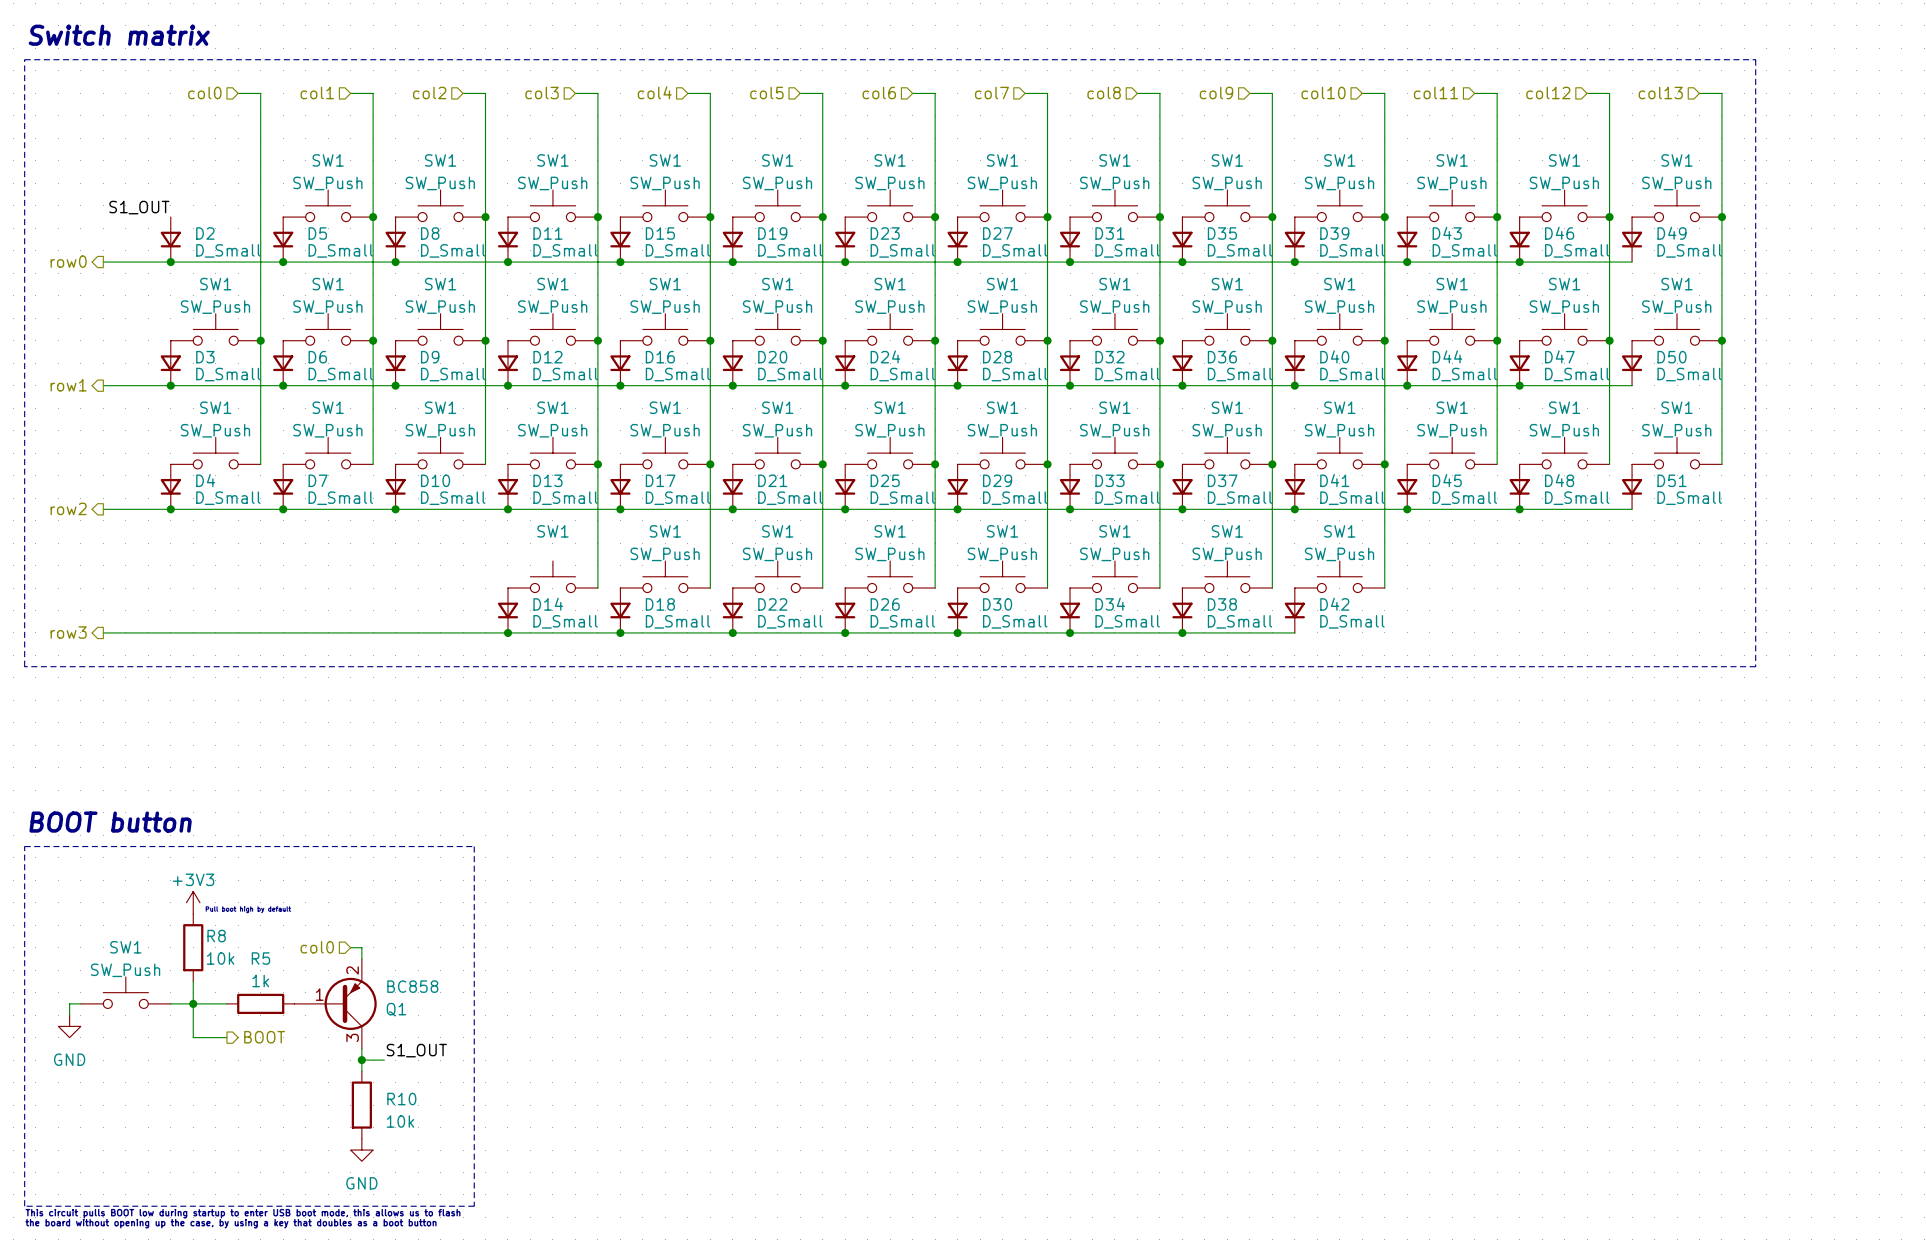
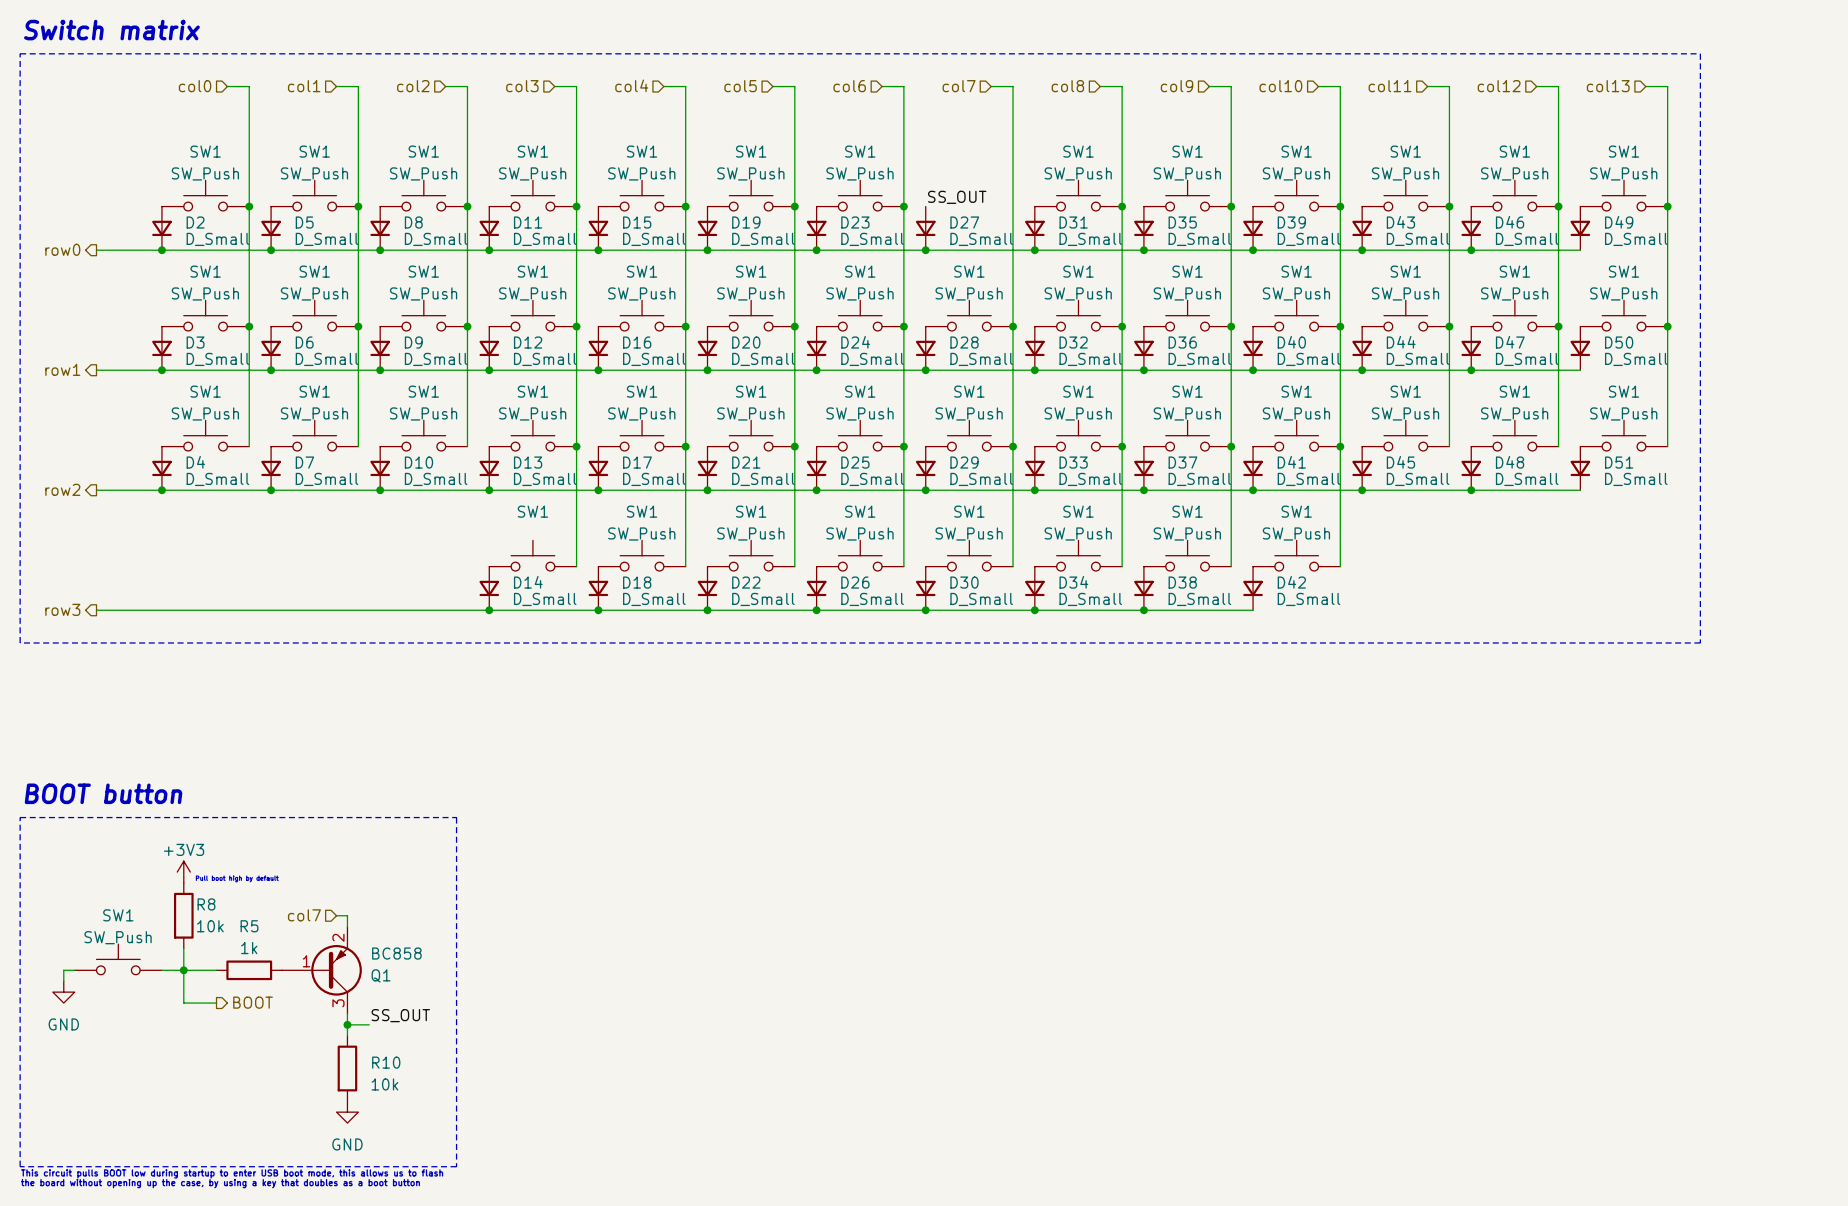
SW1: none -> SW_Push (205, 195)
SW1: SW_Push (1002, 205) -> none
label: S1_OUT (139, 207) -> none
label: none -> SS_OUT (957, 197)
junction: none -> (249, 206)
junction: (1047, 217) -> none
hierarchical label: col0 (317, 947) -> col7 (304, 915)
label: S1_OUT (416, 1050) -> SS_OUT (400, 1015)

